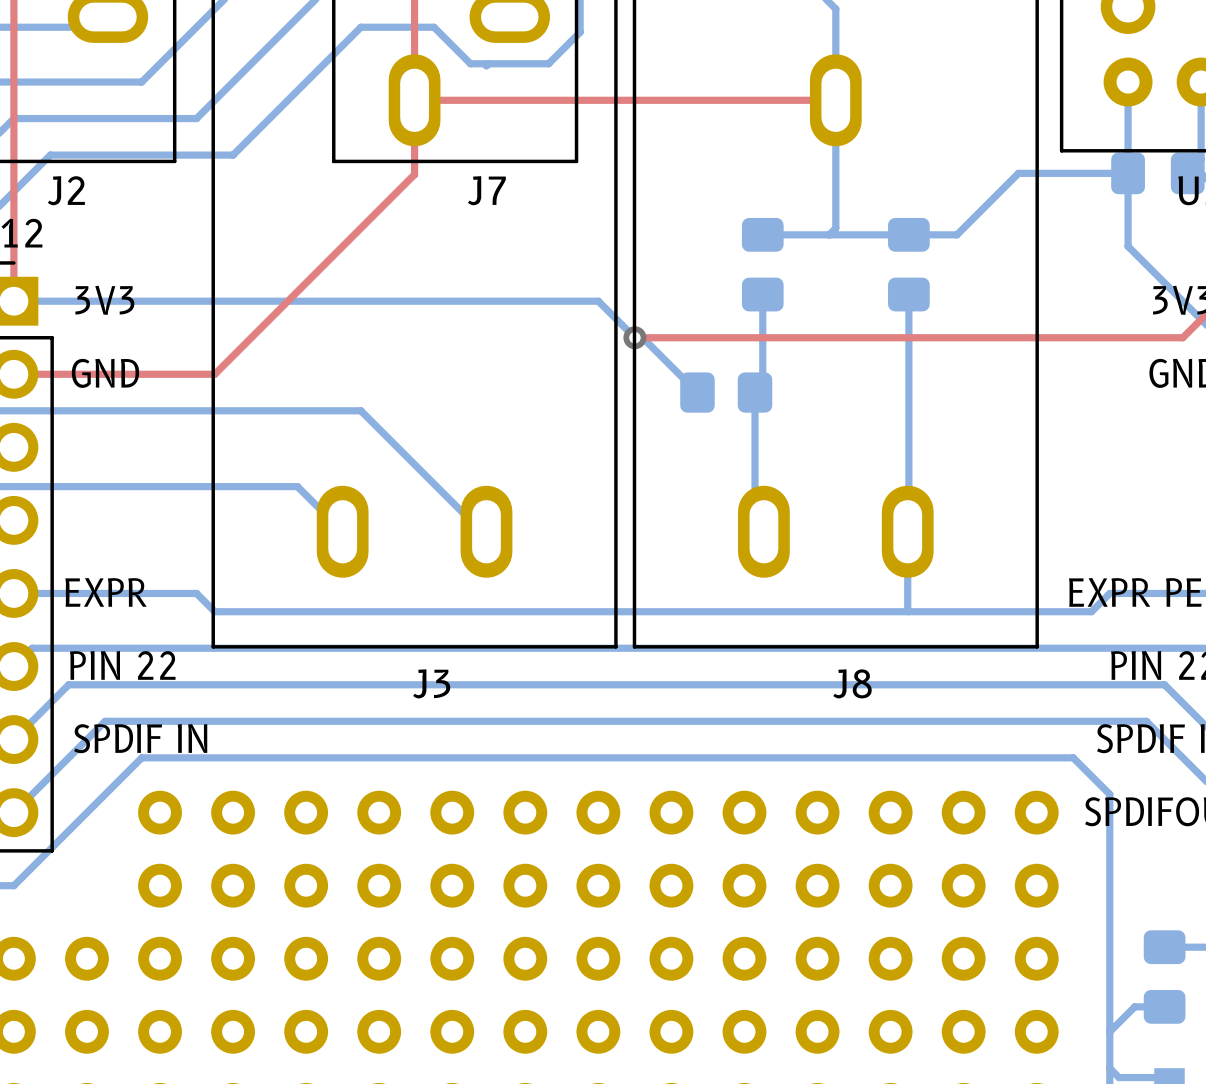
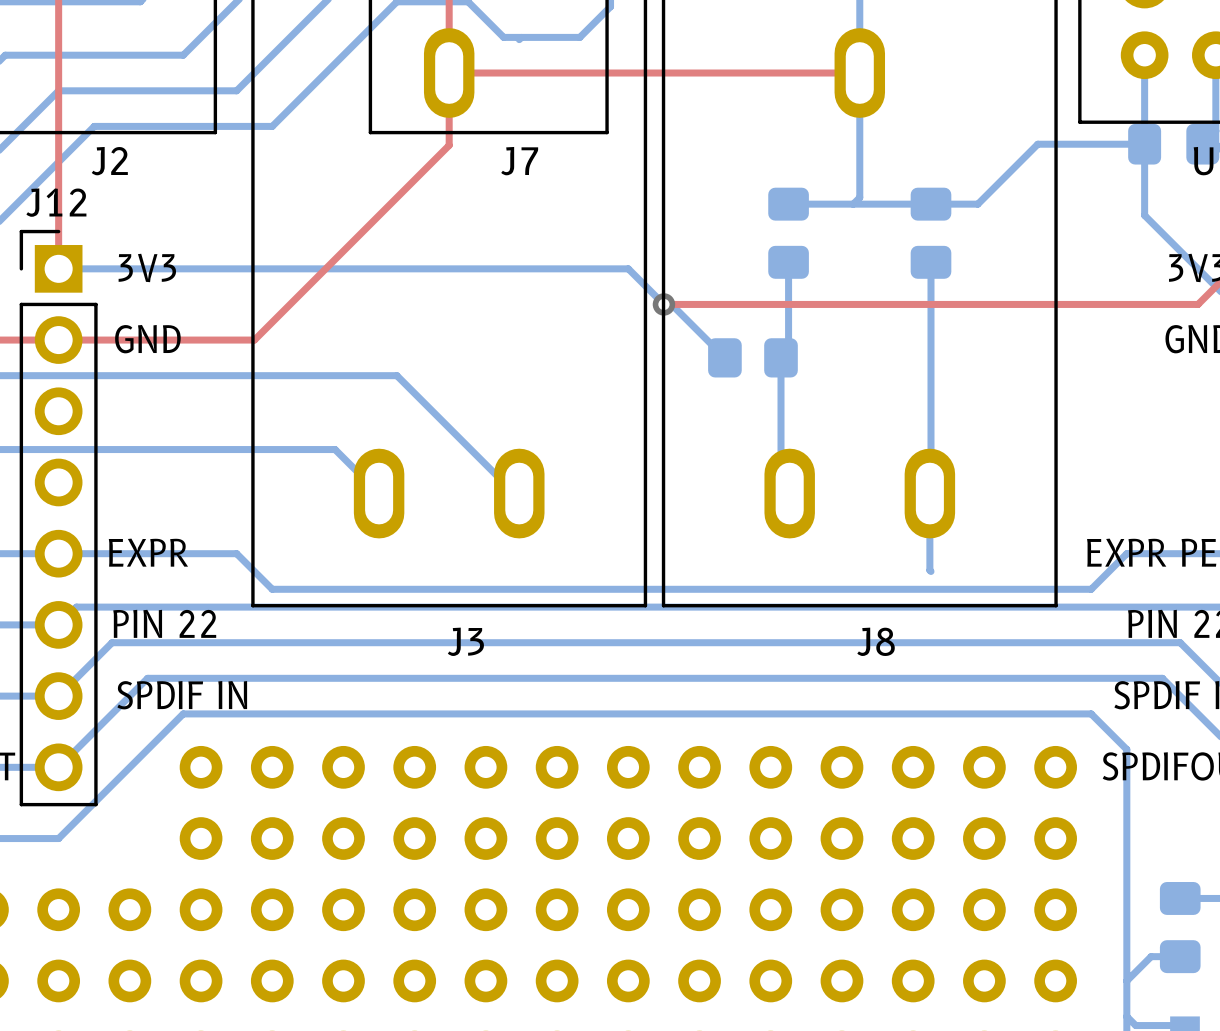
bottom track: (214, 611) (1091, 611) -> (254, 571) (272, 589) (1091, 589) (1109, 571)

